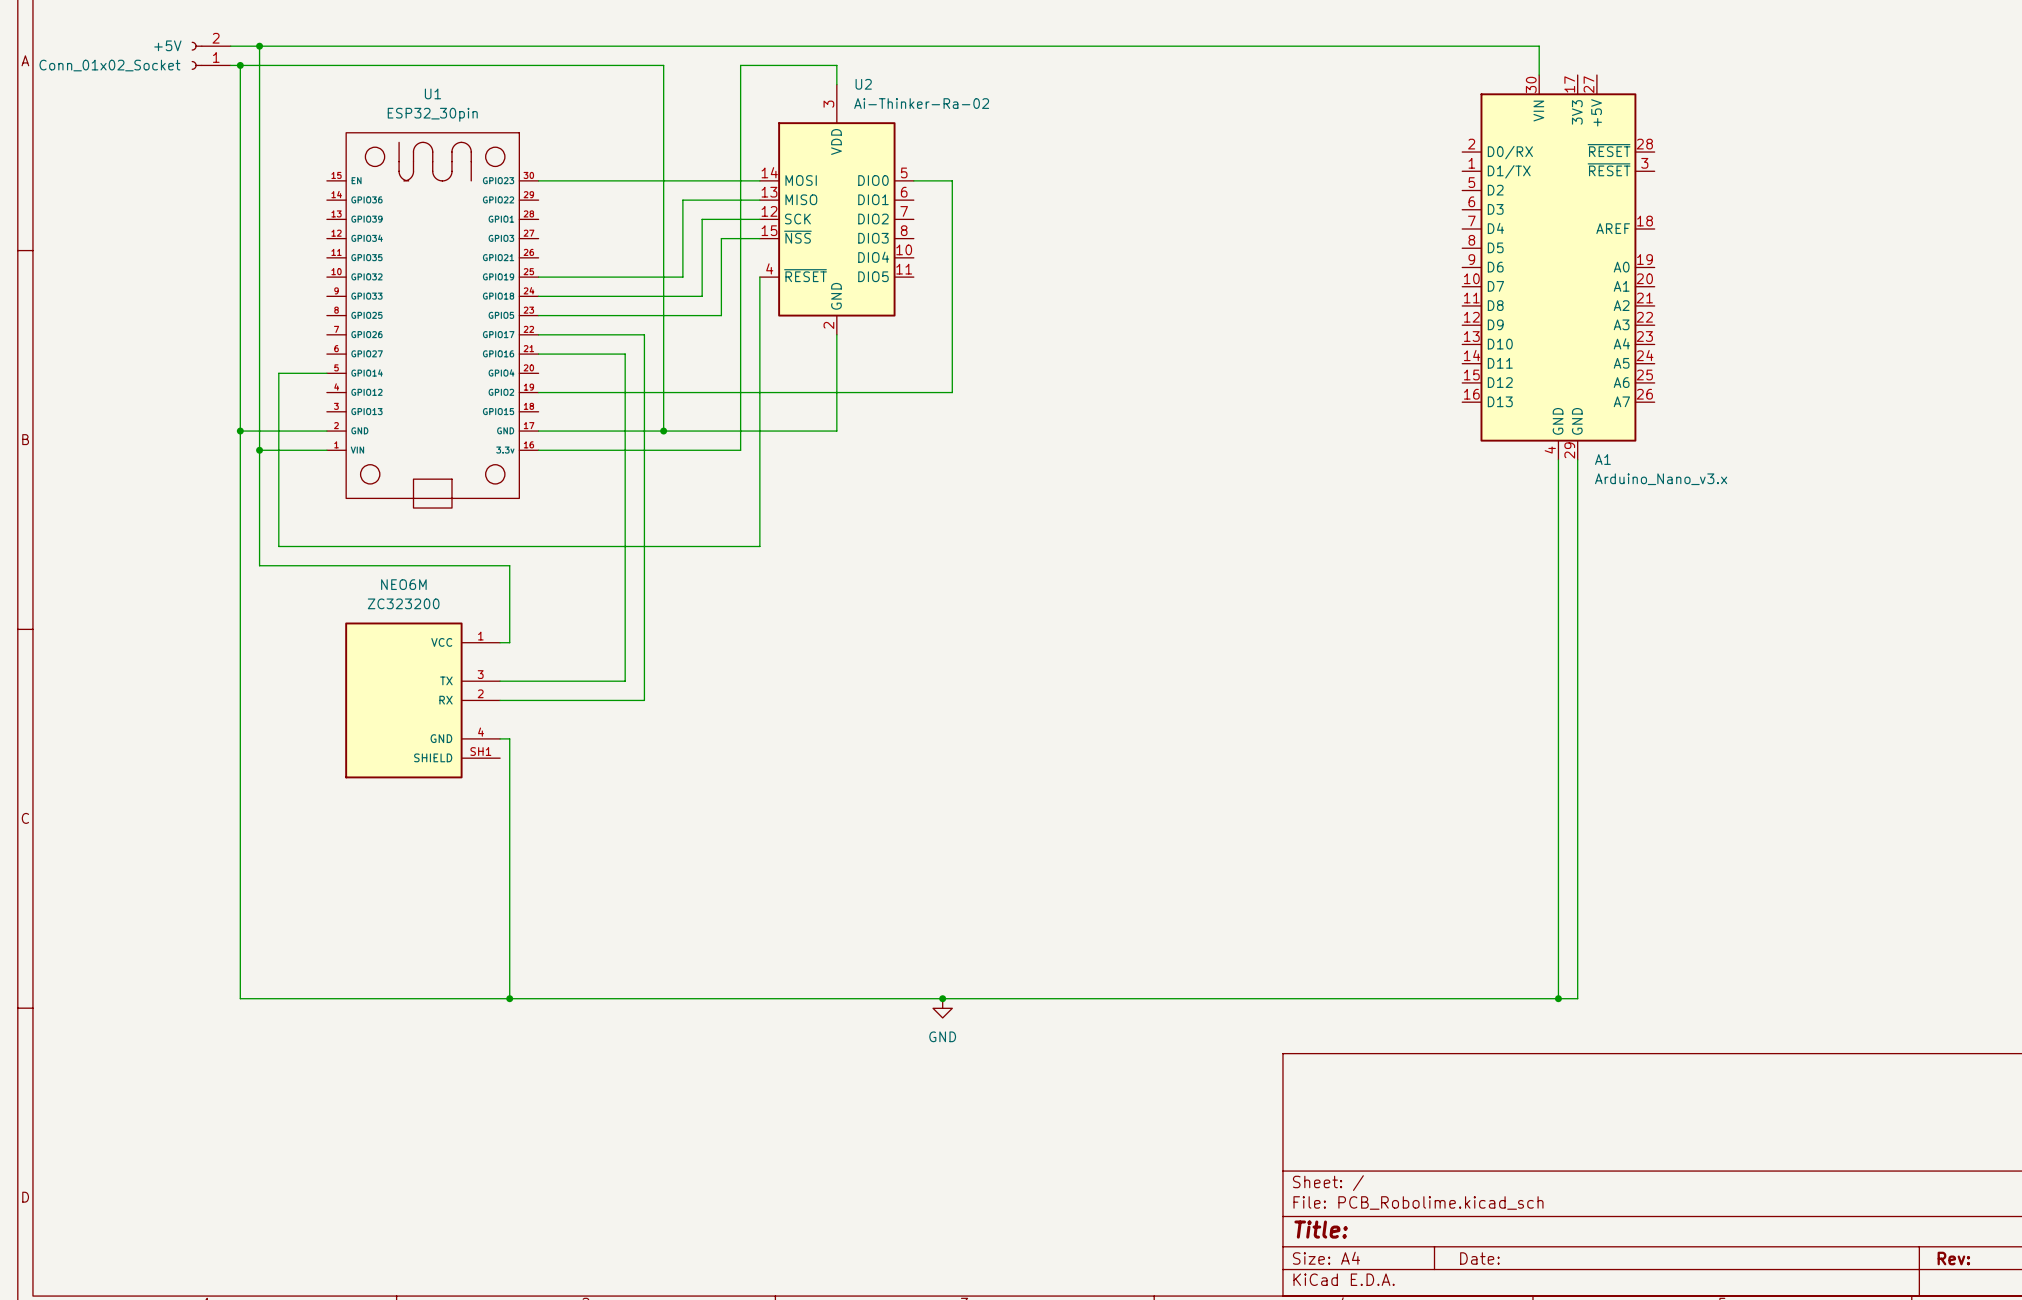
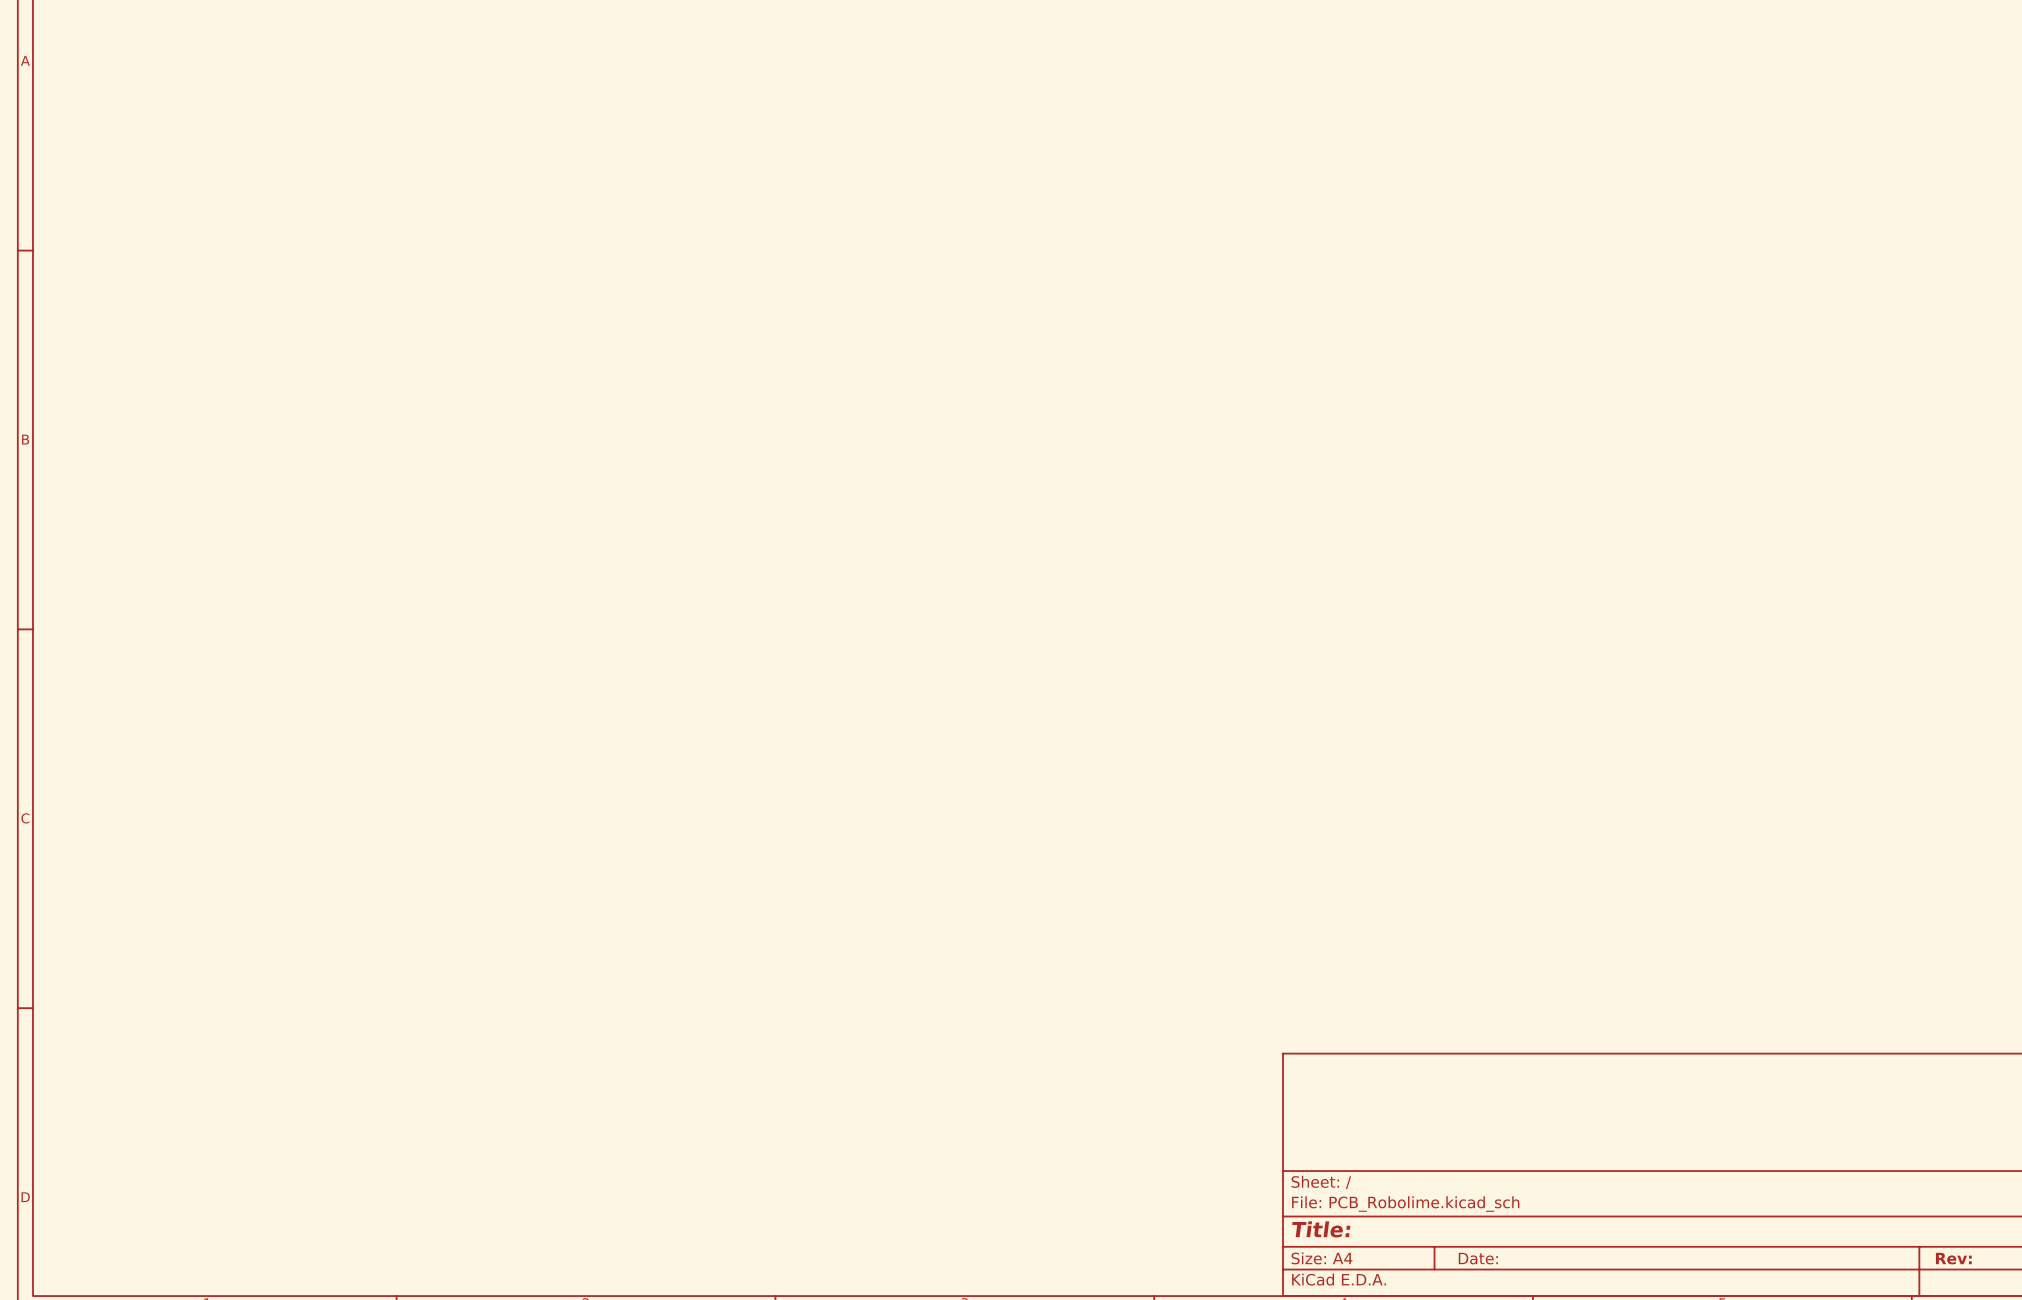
wire: (230, 46) (1539, 46) (1539, 75) -> none
wire: (259, 46) (259, 565) (509, 565) (509, 642) (500, 642) -> none
junction: (259, 46) -> none
+5V: Conn_01x02_Socket (211, 55) -> none
wire: (230, 65) (663, 65) (663, 431) -> none
wire: (240, 65) (240, 998) (1577, 998) (1577, 459) -> none
junction: (240, 65) -> none
wire: (836, 84) (836, 65) (740, 65) (740, 450) (538, 450) -> none
wire: (538, 180) (759, 180) -> none
wire: (913, 180) (952, 180) (952, 392) (538, 392) -> none
wire: (759, 200) (682, 200) (682, 277) (538, 277) -> none
U2: Ai-Thinker-Ra-02 (836, 209) -> none
wire: (759, 219) (702, 219) (702, 296) (538, 296) -> none
wire: (759, 238) (721, 238) (721, 315) (538, 315) -> none
A1: Arduino_Nano_v3.x (1558, 267) -> none
wire: (759, 277) (759, 546) (278, 546) (278, 373) (326, 373) -> none
U1: (432, 320) -> none
wire: (538, 334) (644, 334) (644, 700) (500, 700) -> none
wire: (836, 334) (836, 431) (538, 431) -> none
wire: (538, 354) (625, 354) (625, 681) (500, 681) -> none
wire: (240, 431) (326, 431) -> none
junction: (240, 431) -> none
junction: (663, 431) -> none
wire: (259, 450) (326, 450) -> none
junction: (259, 450) -> none
wire: (1558, 459) (1558, 998) -> none
NEO6M: ZC323200 (422, 700) -> none
wire: (500, 738) (509, 738) (509, 998) -> none
junction: (509, 998) -> none
junction: (942, 998) -> none
junction: (1558, 998) -> none
power symbol: GND (942, 1008) -> none

